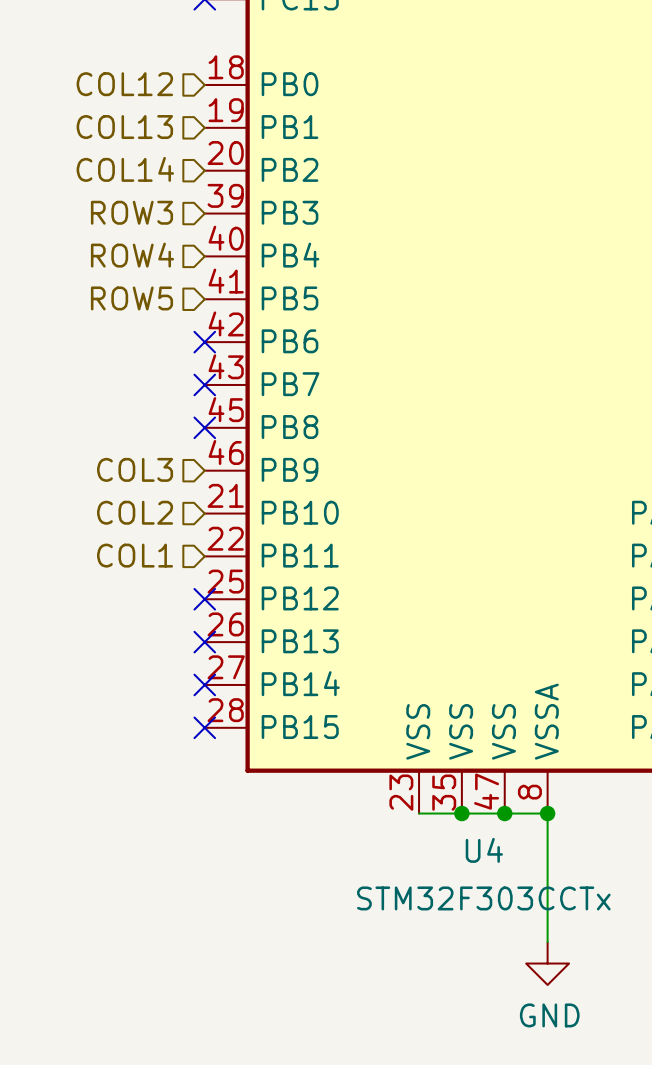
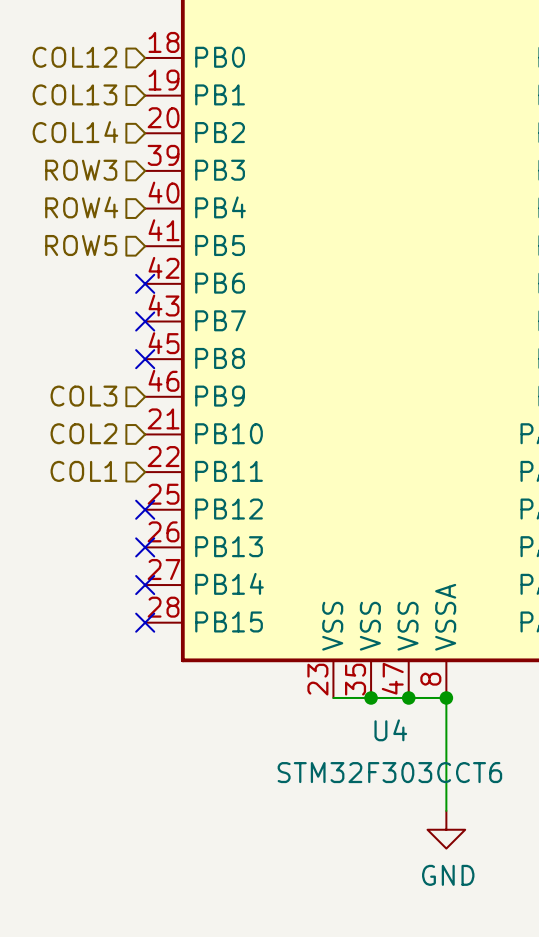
U4 value: STM32F303CCTx (483, 898) -> STM32F303CCT6 (389, 772)

